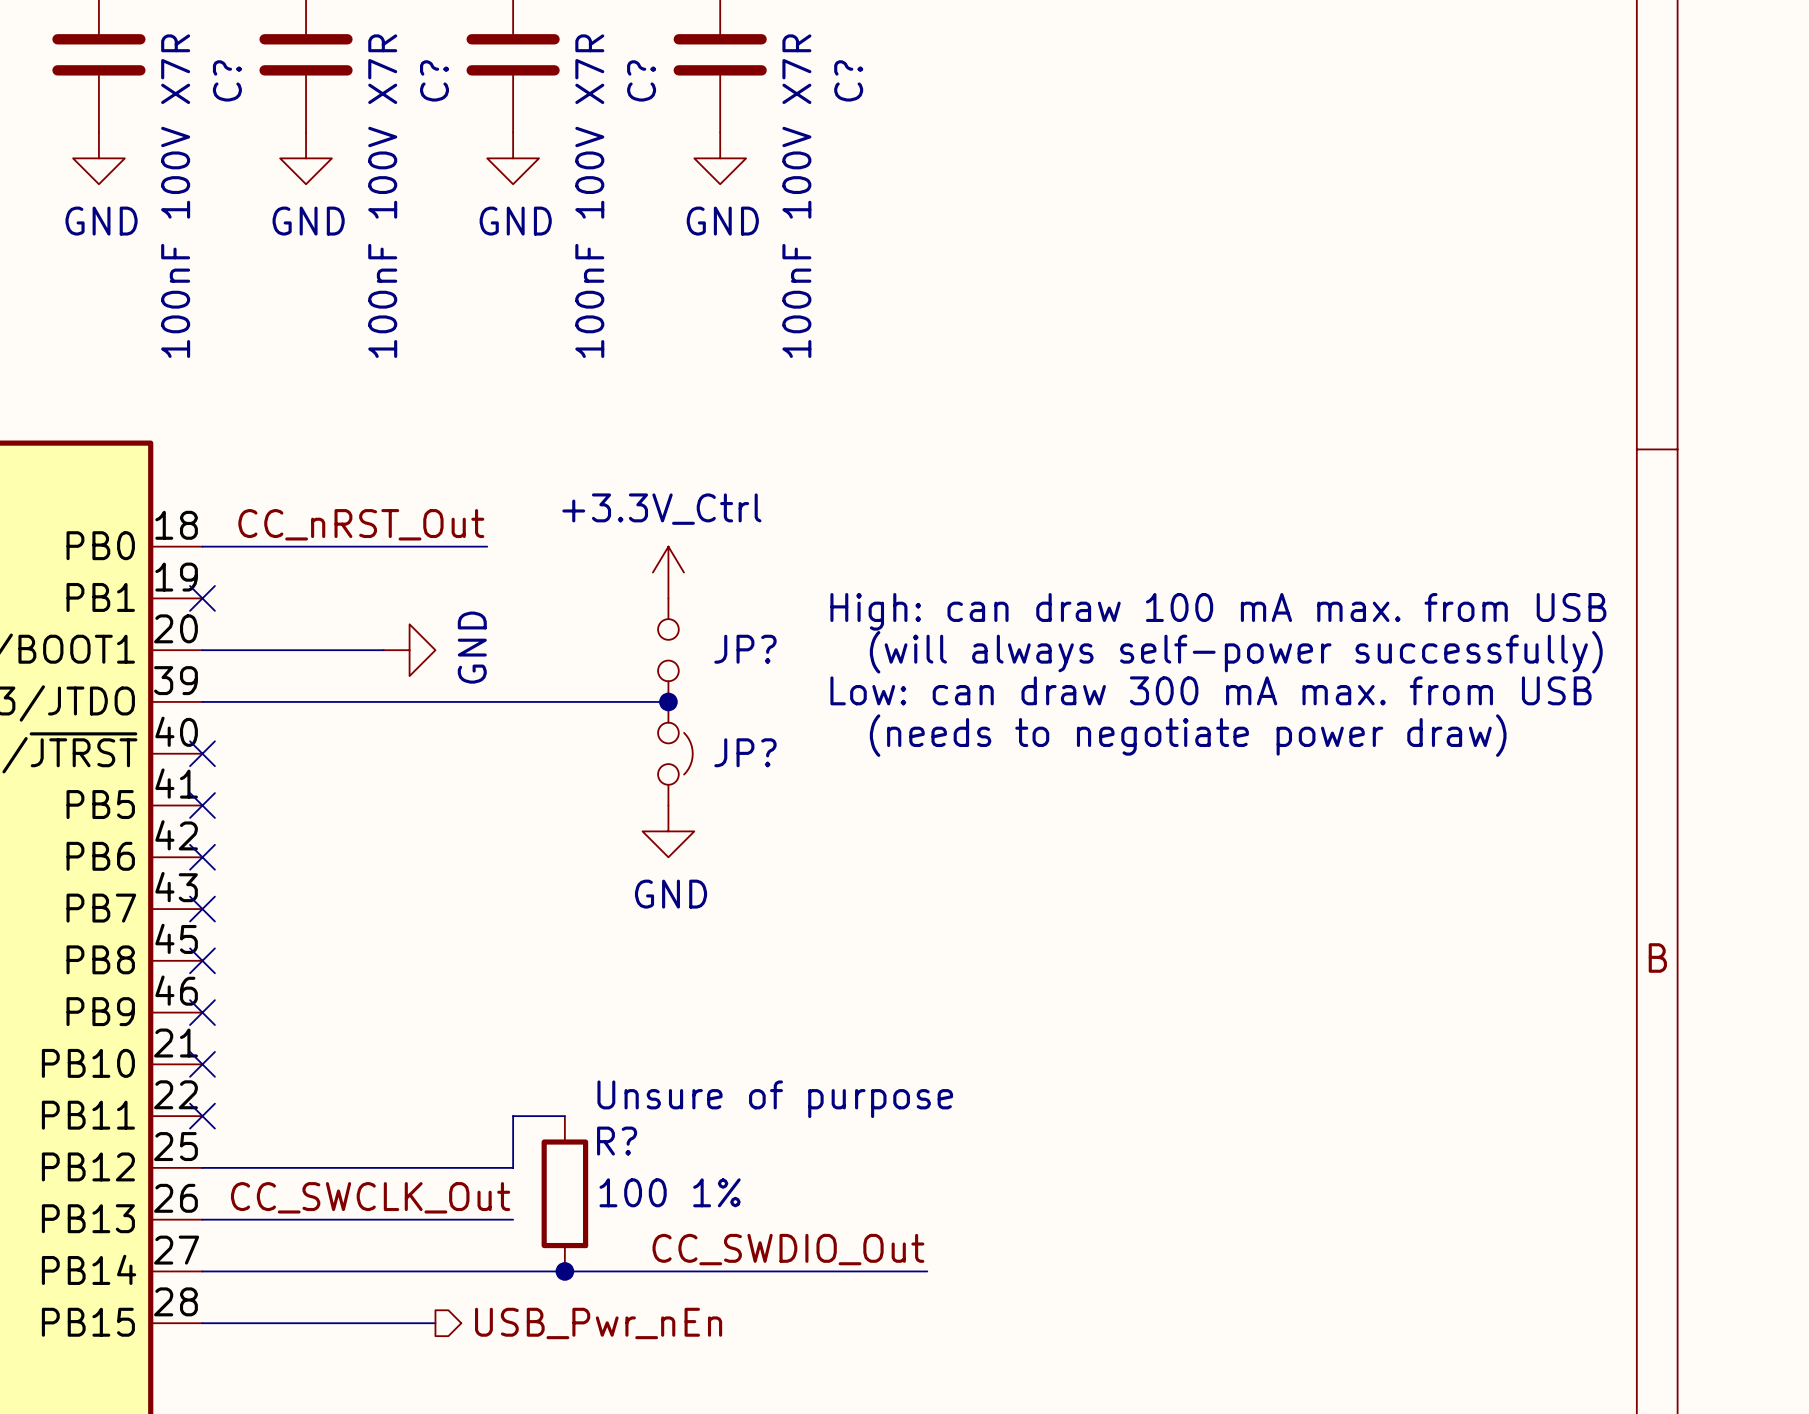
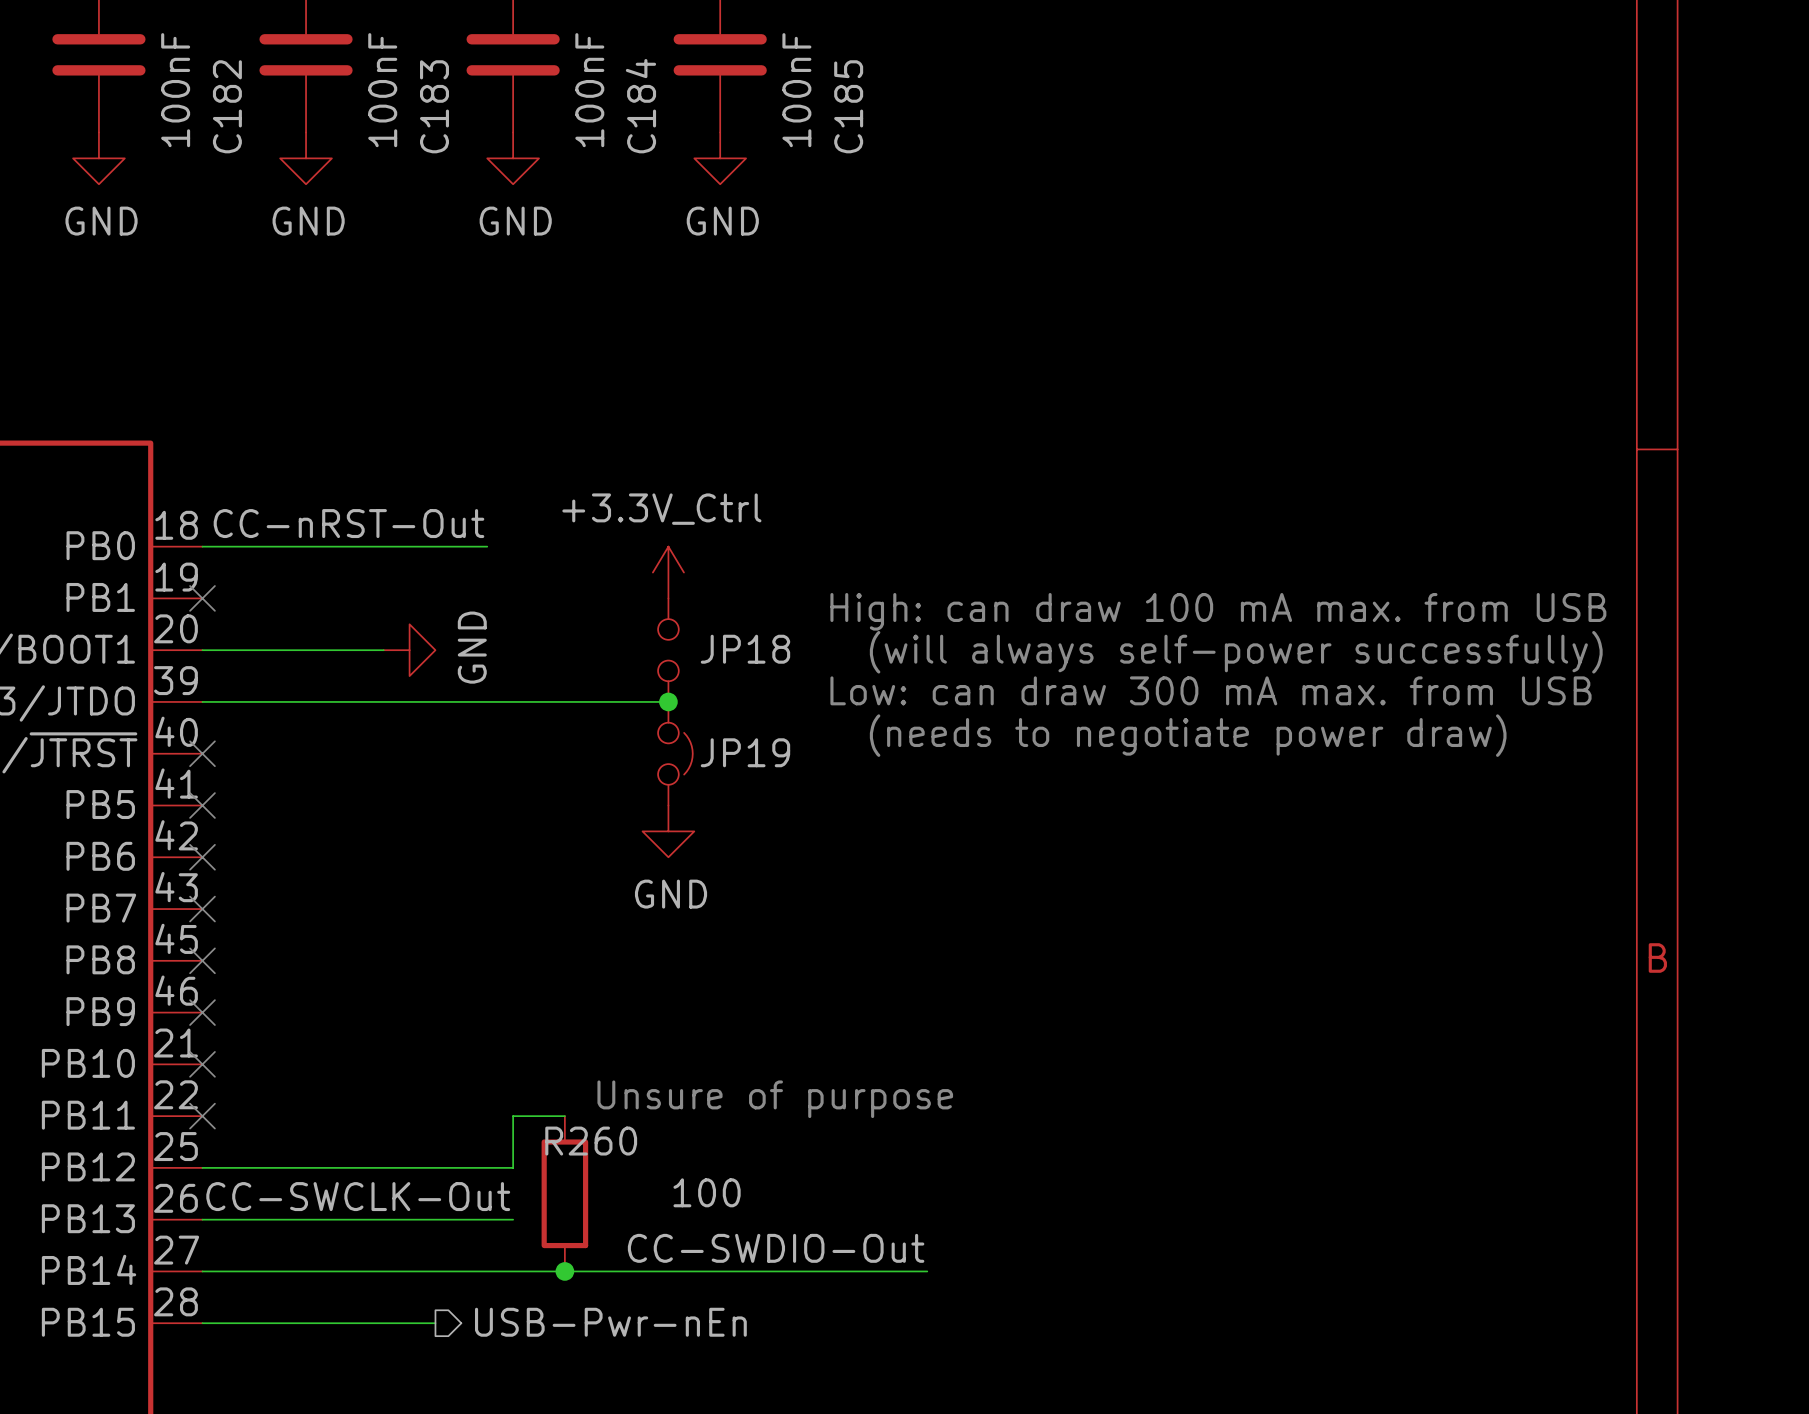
C? name: C? (227, 80) -> C182 (227, 106)
C? name: C? (434, 80) -> C183 (434, 106)
C? name: C? (641, 80) -> C184 (640, 106)
C? name: C? (848, 80) -> C185 (848, 106)
C? value: 100nF 100V X7R (175, 196) -> 100nF (175, 90)
C? value: 100nF 100V X7R (382, 196) -> 100nF (382, 90)
C? value: 100nF 100V X7R (589, 196) -> 100nF (589, 90)
C? value: 100nF 100V X7R (796, 196) -> 100nF (796, 90)
label: CC_nRST_Out (361, 524) -> CC-nRST-Out (348, 523)
JP? name: JP? (745, 649) -> JP18 (745, 649)
JP? name: JP? (745, 752) -> JP19 (745, 752)
R? name: R? (617, 1141) -> R260 (591, 1141)
R? value: 100 1% (670, 1192) -> 100 (707, 1192)
label: CC_SWCLK_Out (370, 1197) -> CC-SWCLK-Out (358, 1196)
label: CC_SWDIO_Out (788, 1249) -> CC-SWDIO-Out (776, 1248)
hierarchical label: USB_Pwr_nEn (598, 1323) -> USB-Pwr-nEn (610, 1322)

